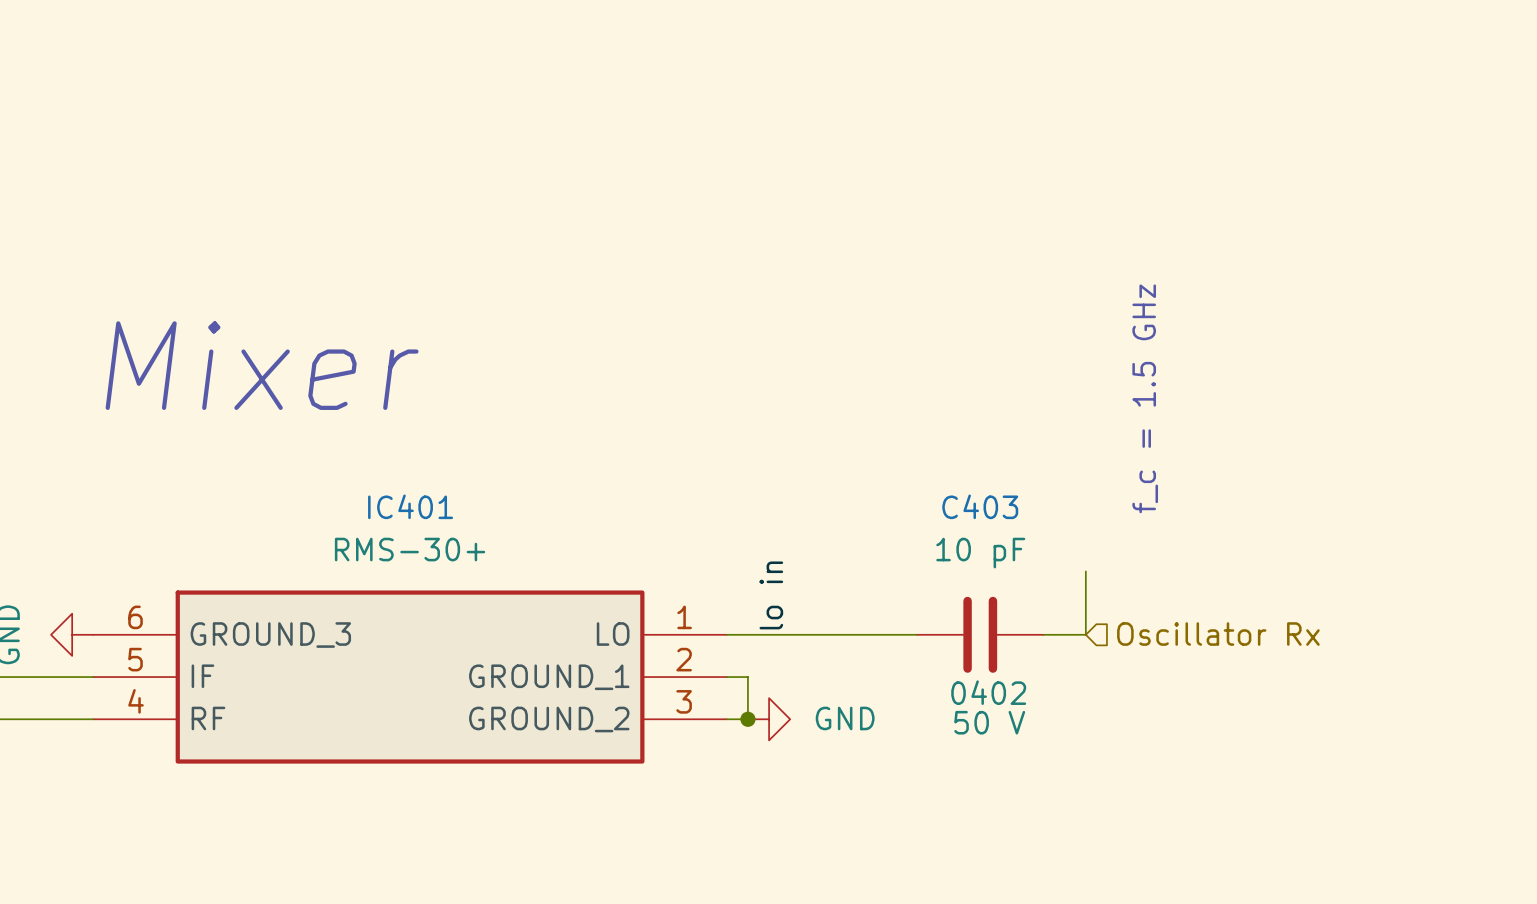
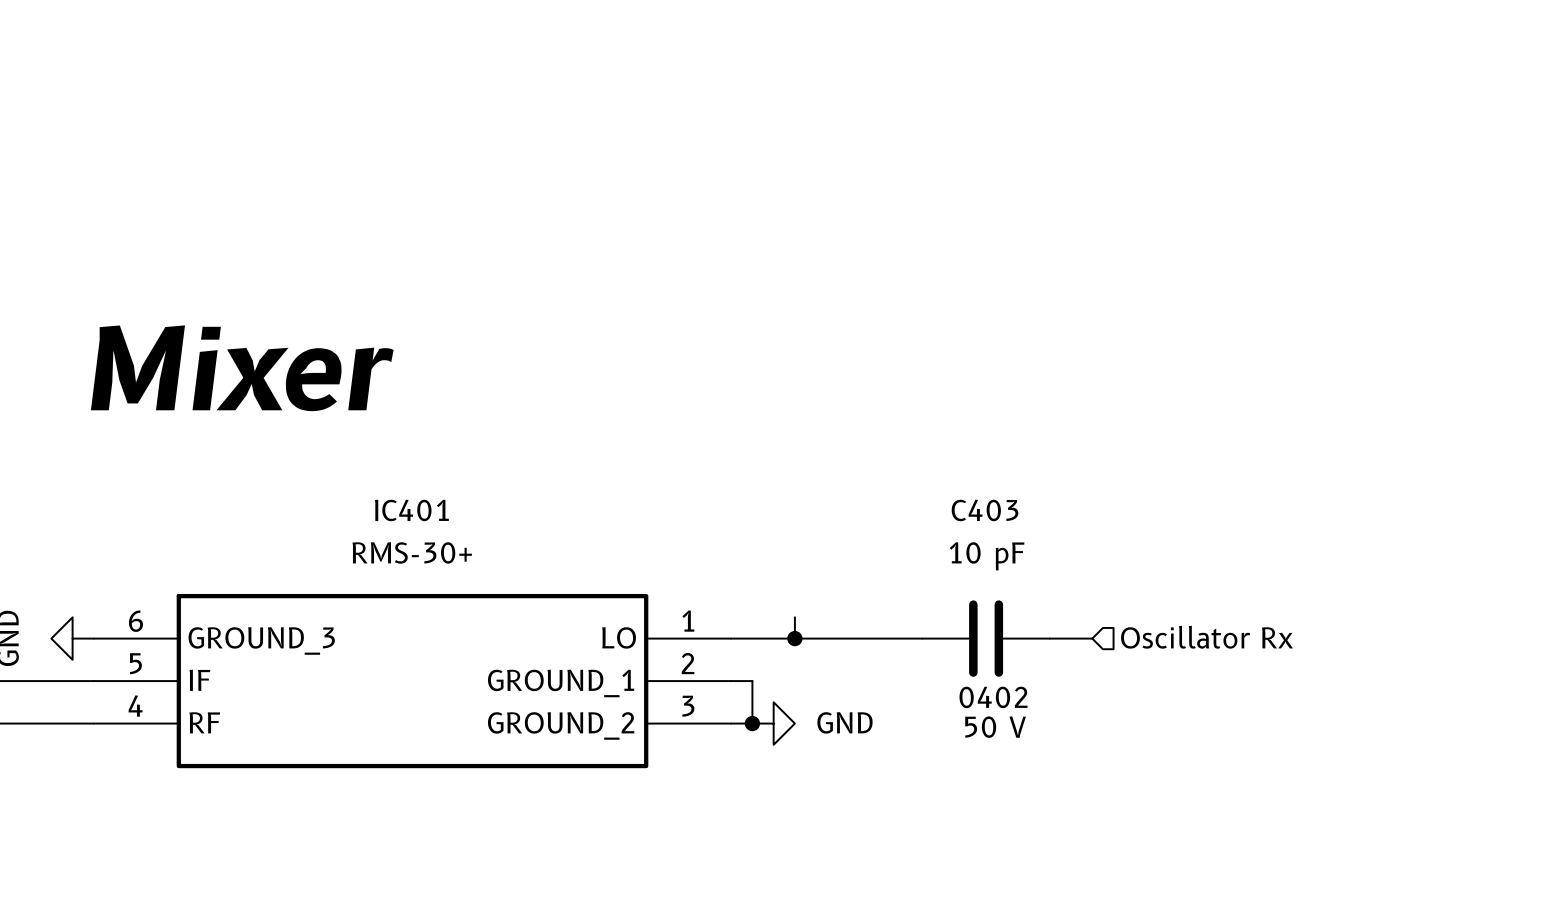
text: f_c = 1.5 GHz (1145, 398) -> none
wire: (1085, 571) (1085, 634) -> none
label: lo in (771, 595) -> none
wire: none -> (794, 617) (794, 638)
junction: none -> (794, 638)

